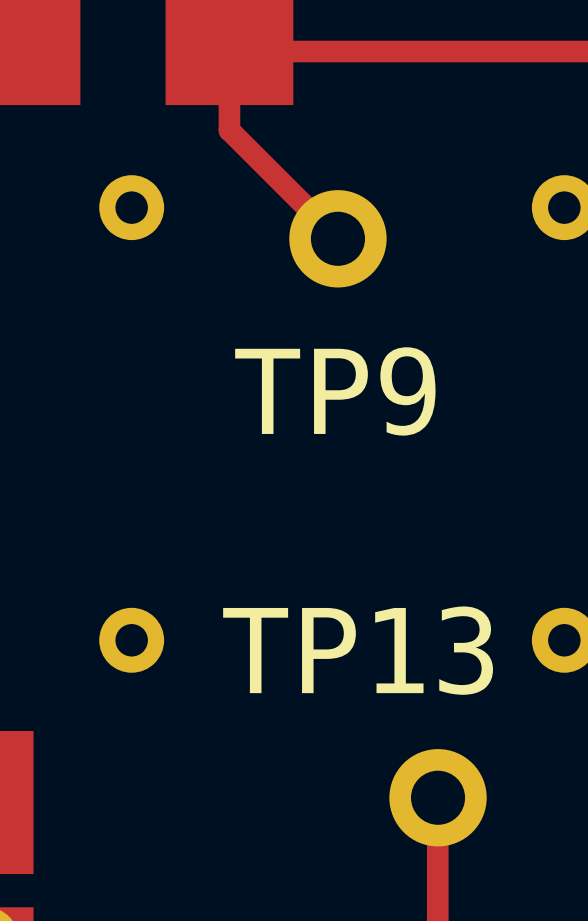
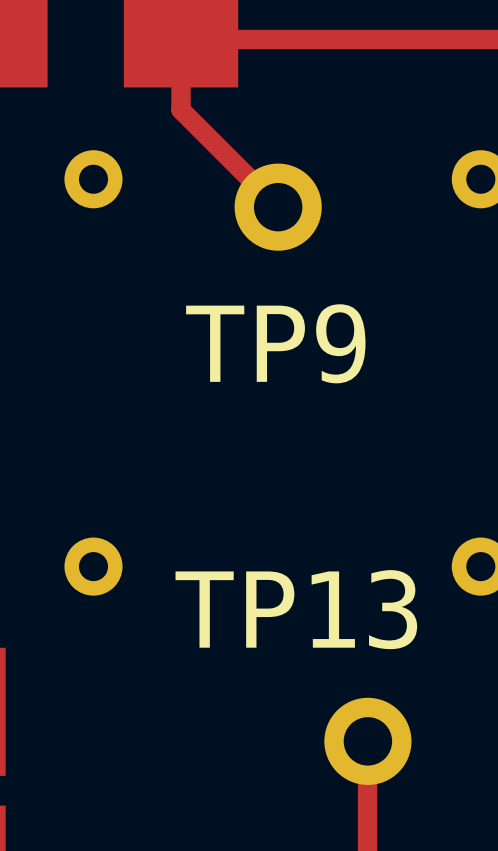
TP13 position: (438, 797) -> (367, 741)

